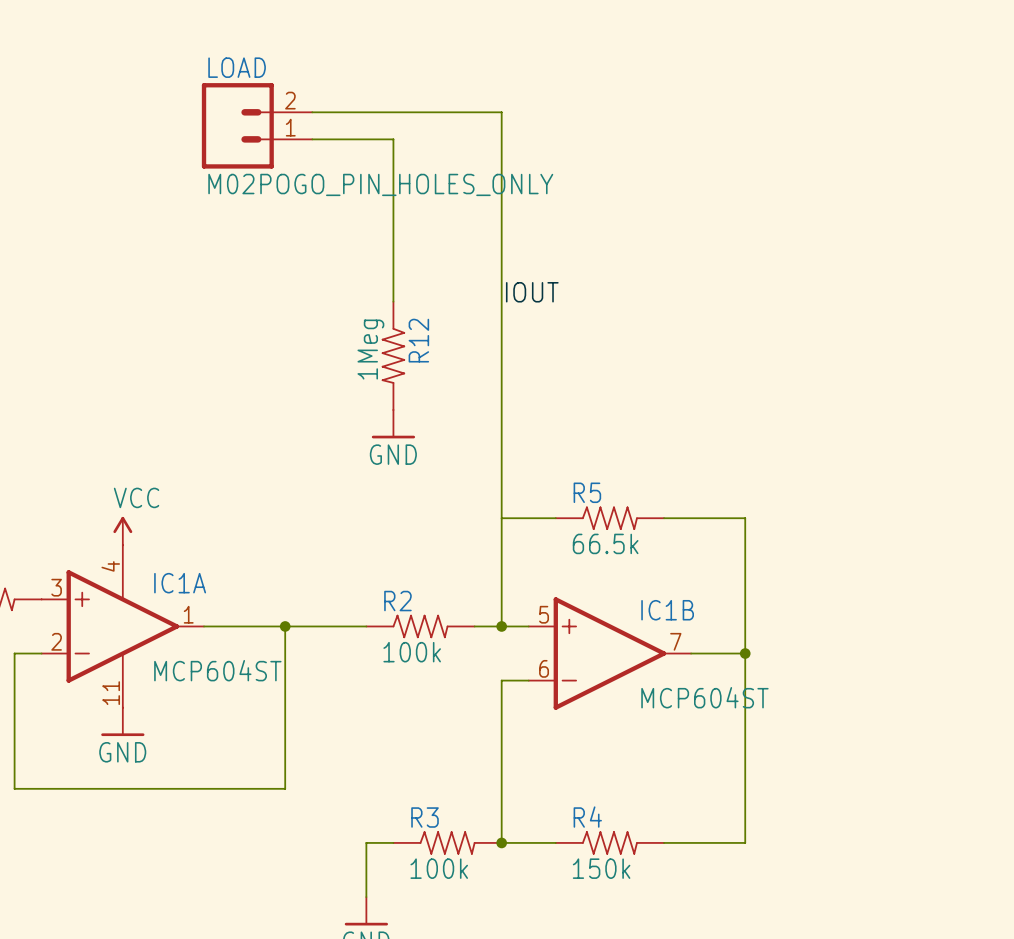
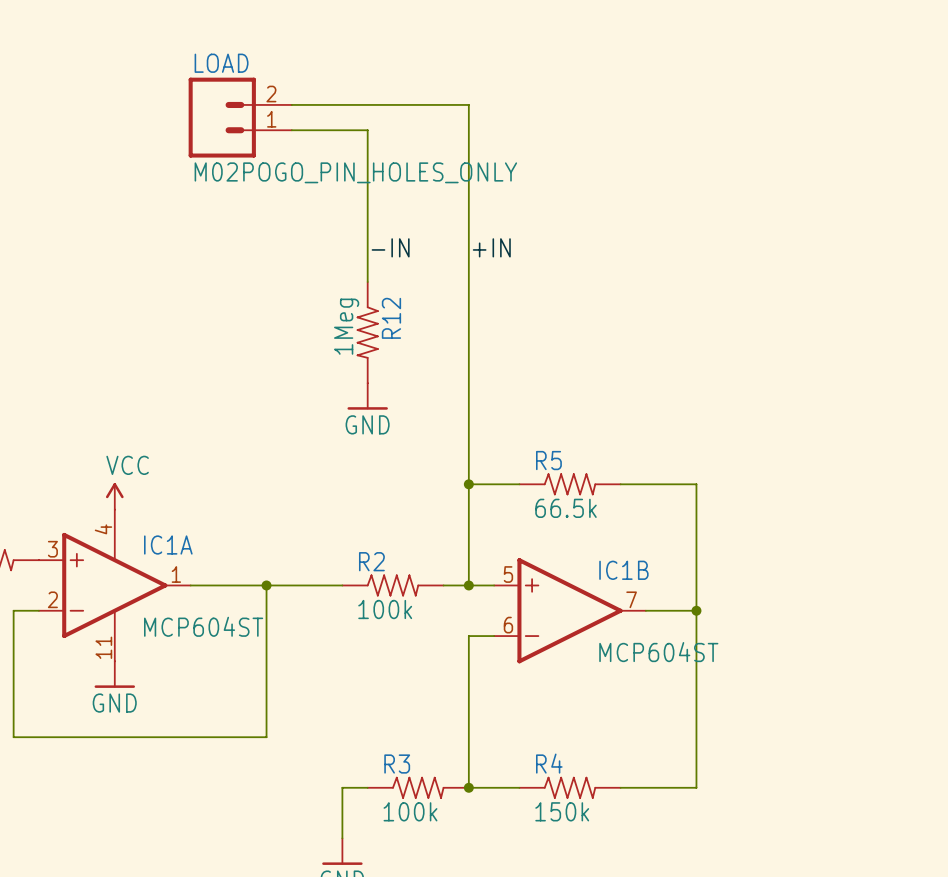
label: none -> -IN (390, 247)
label: none -> +IN (491, 247)
label: IOUT (532, 292) -> none
junction: none -> (468, 484)

